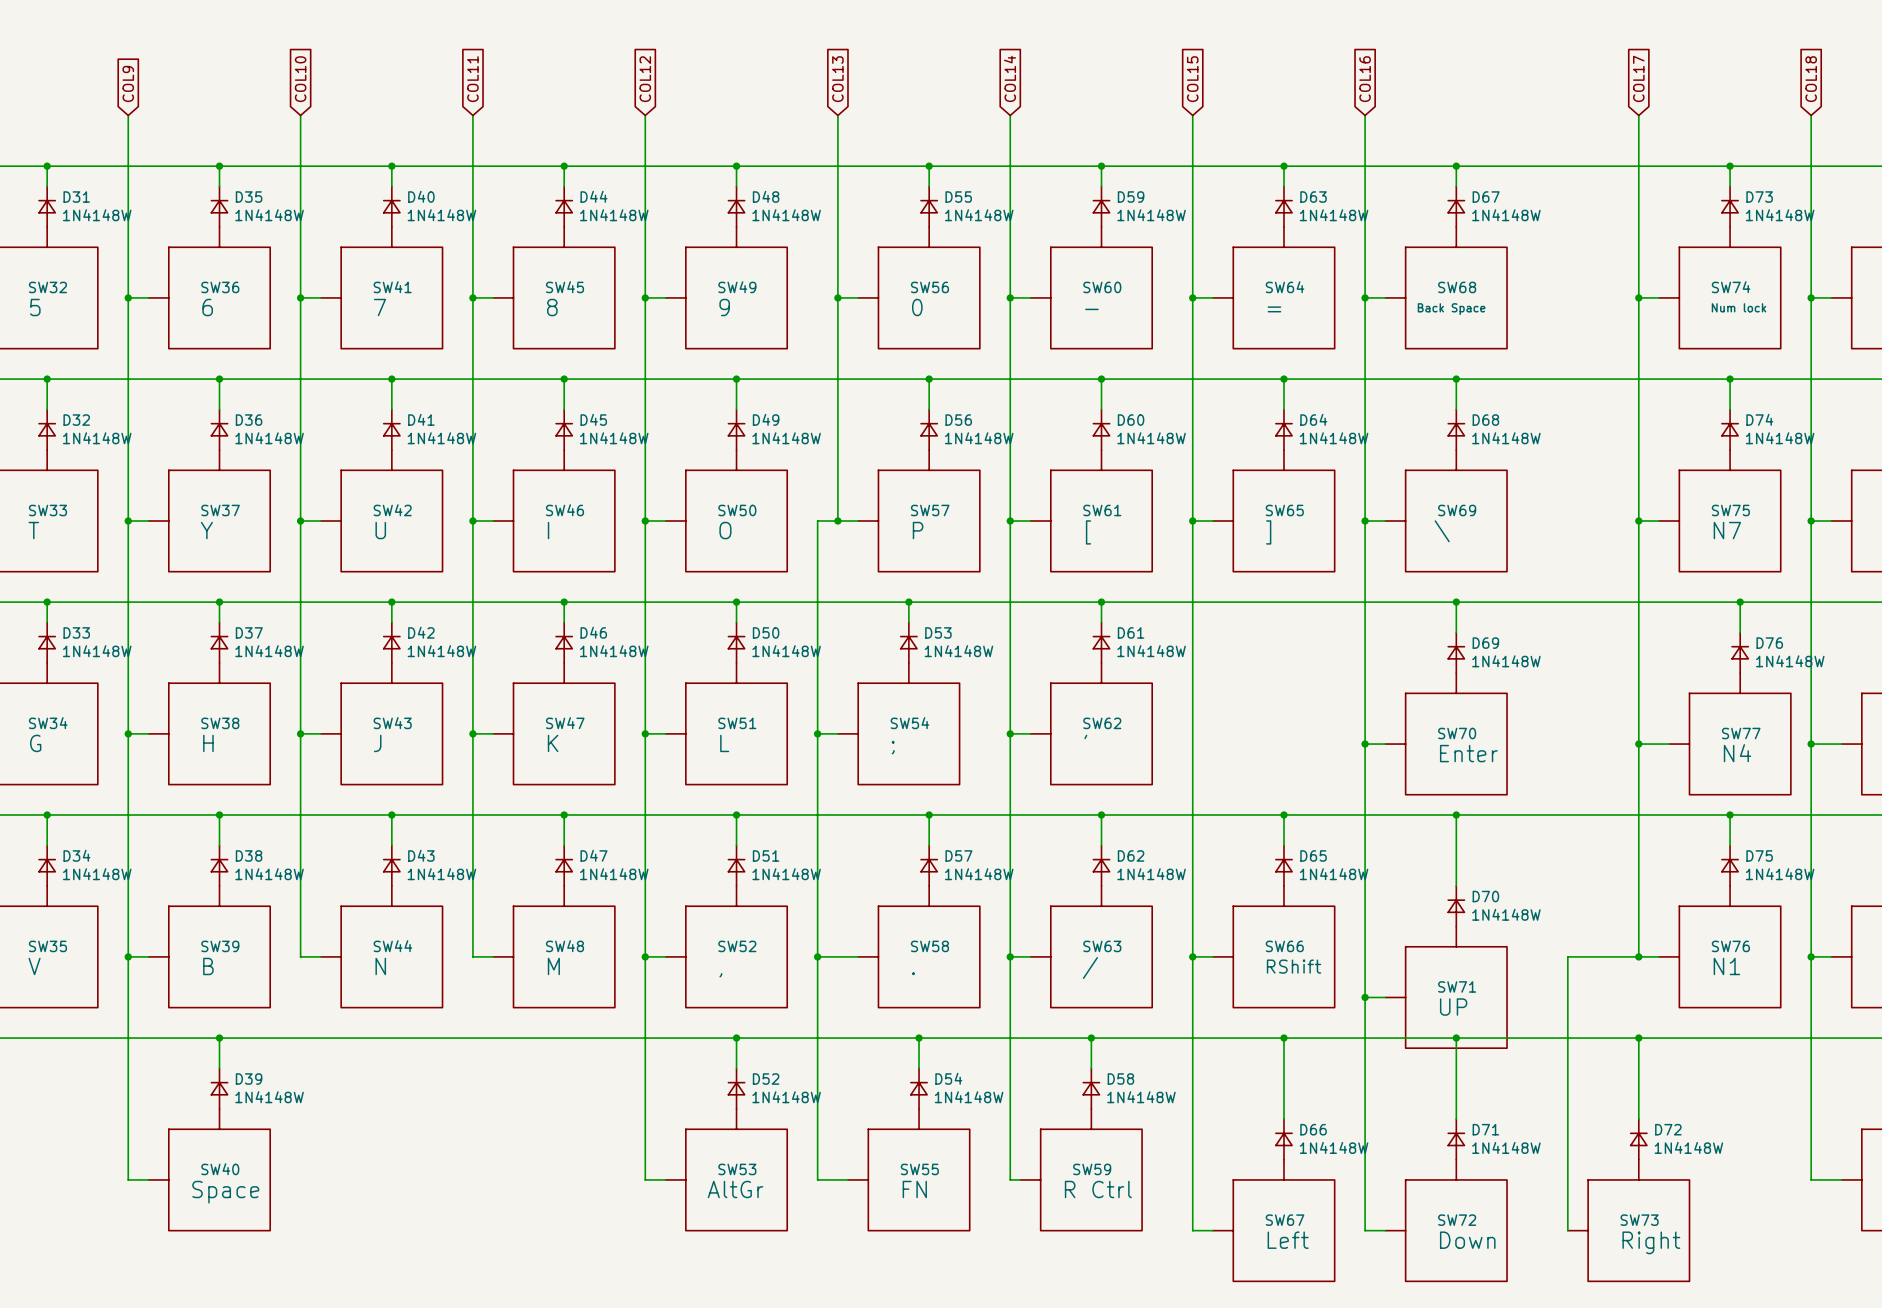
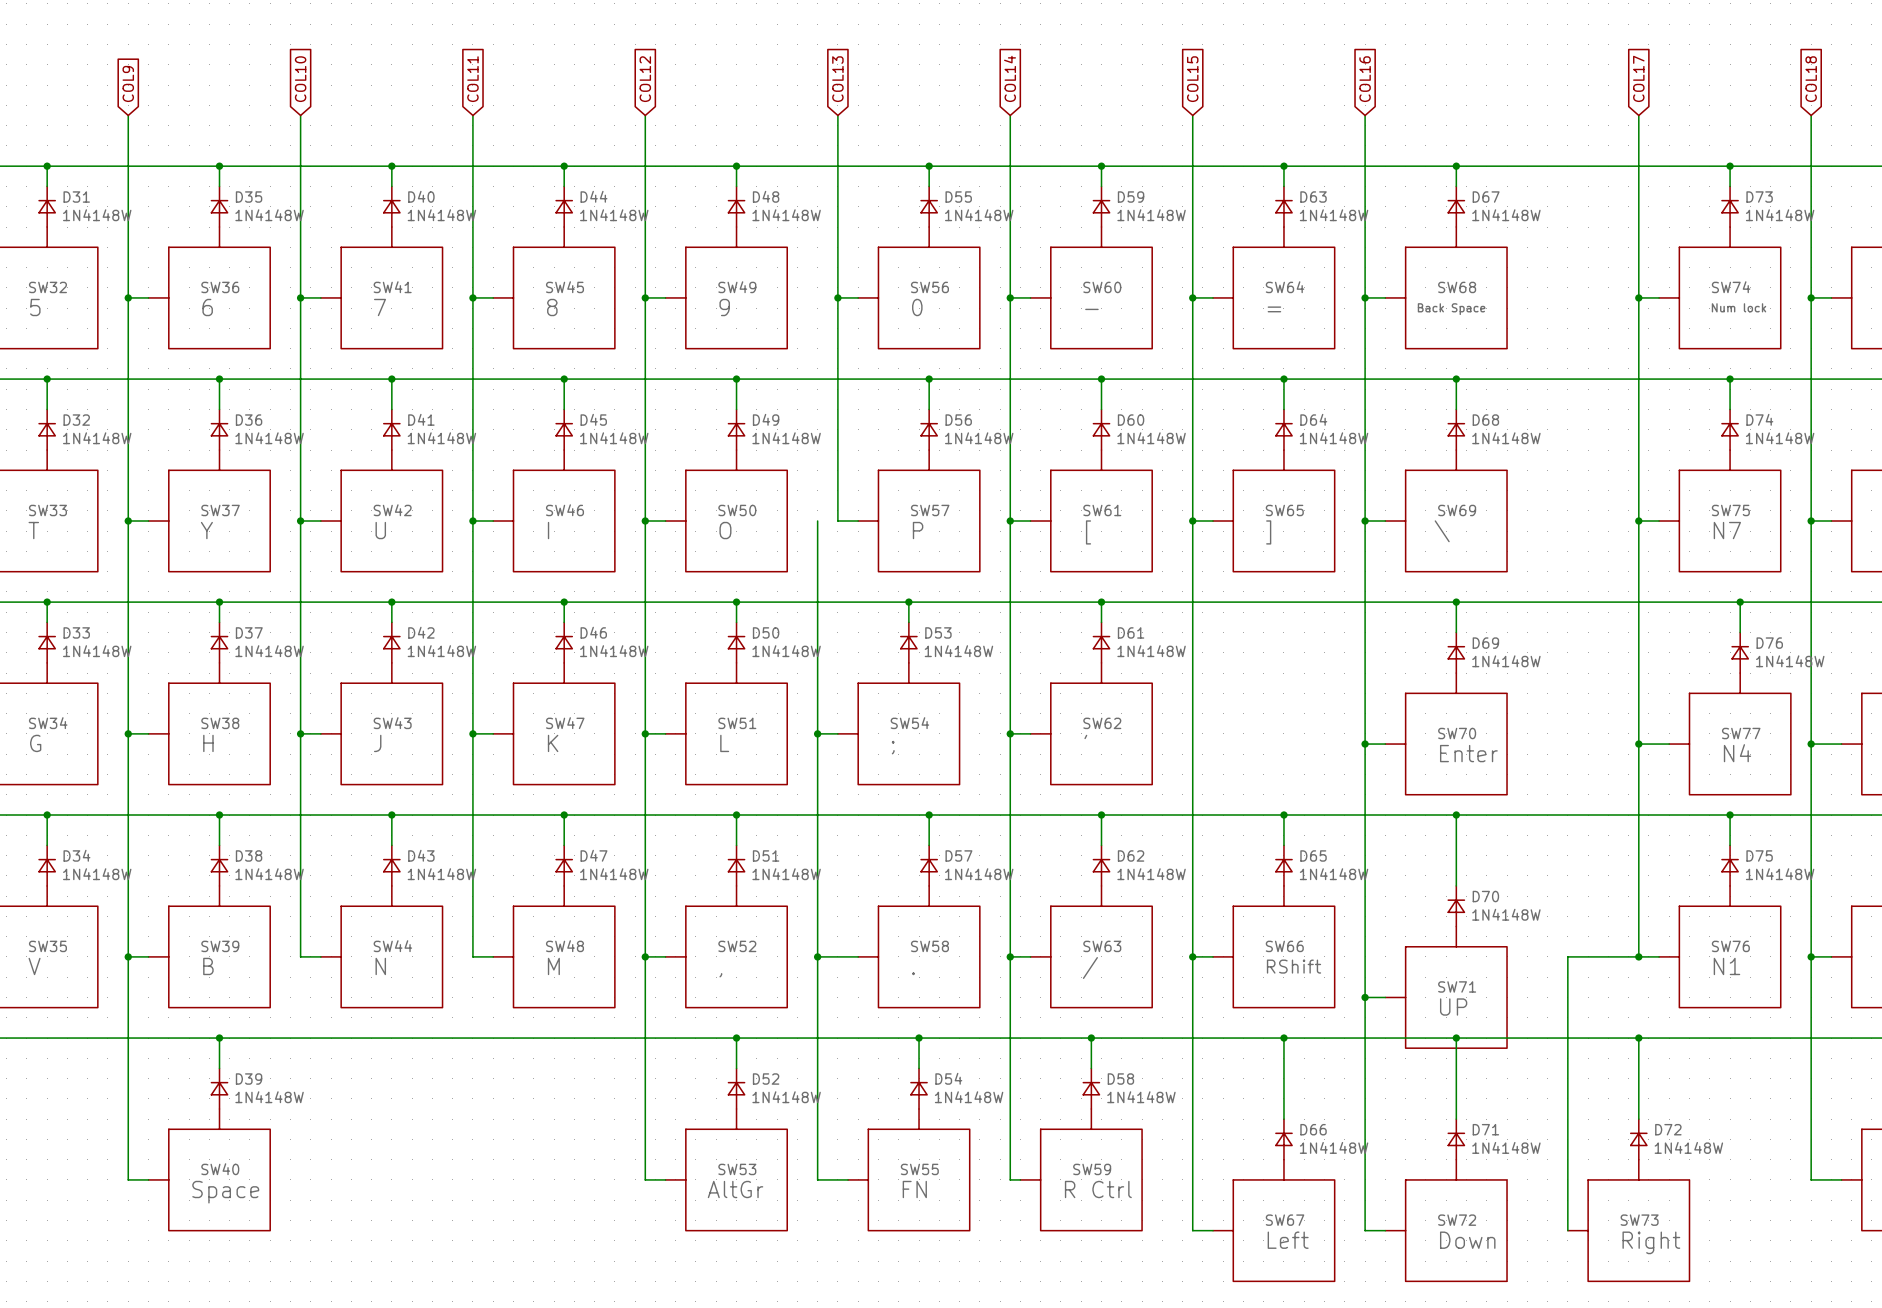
wire: (817, 521) (837, 521) -> none
junction: (837, 521) -> none

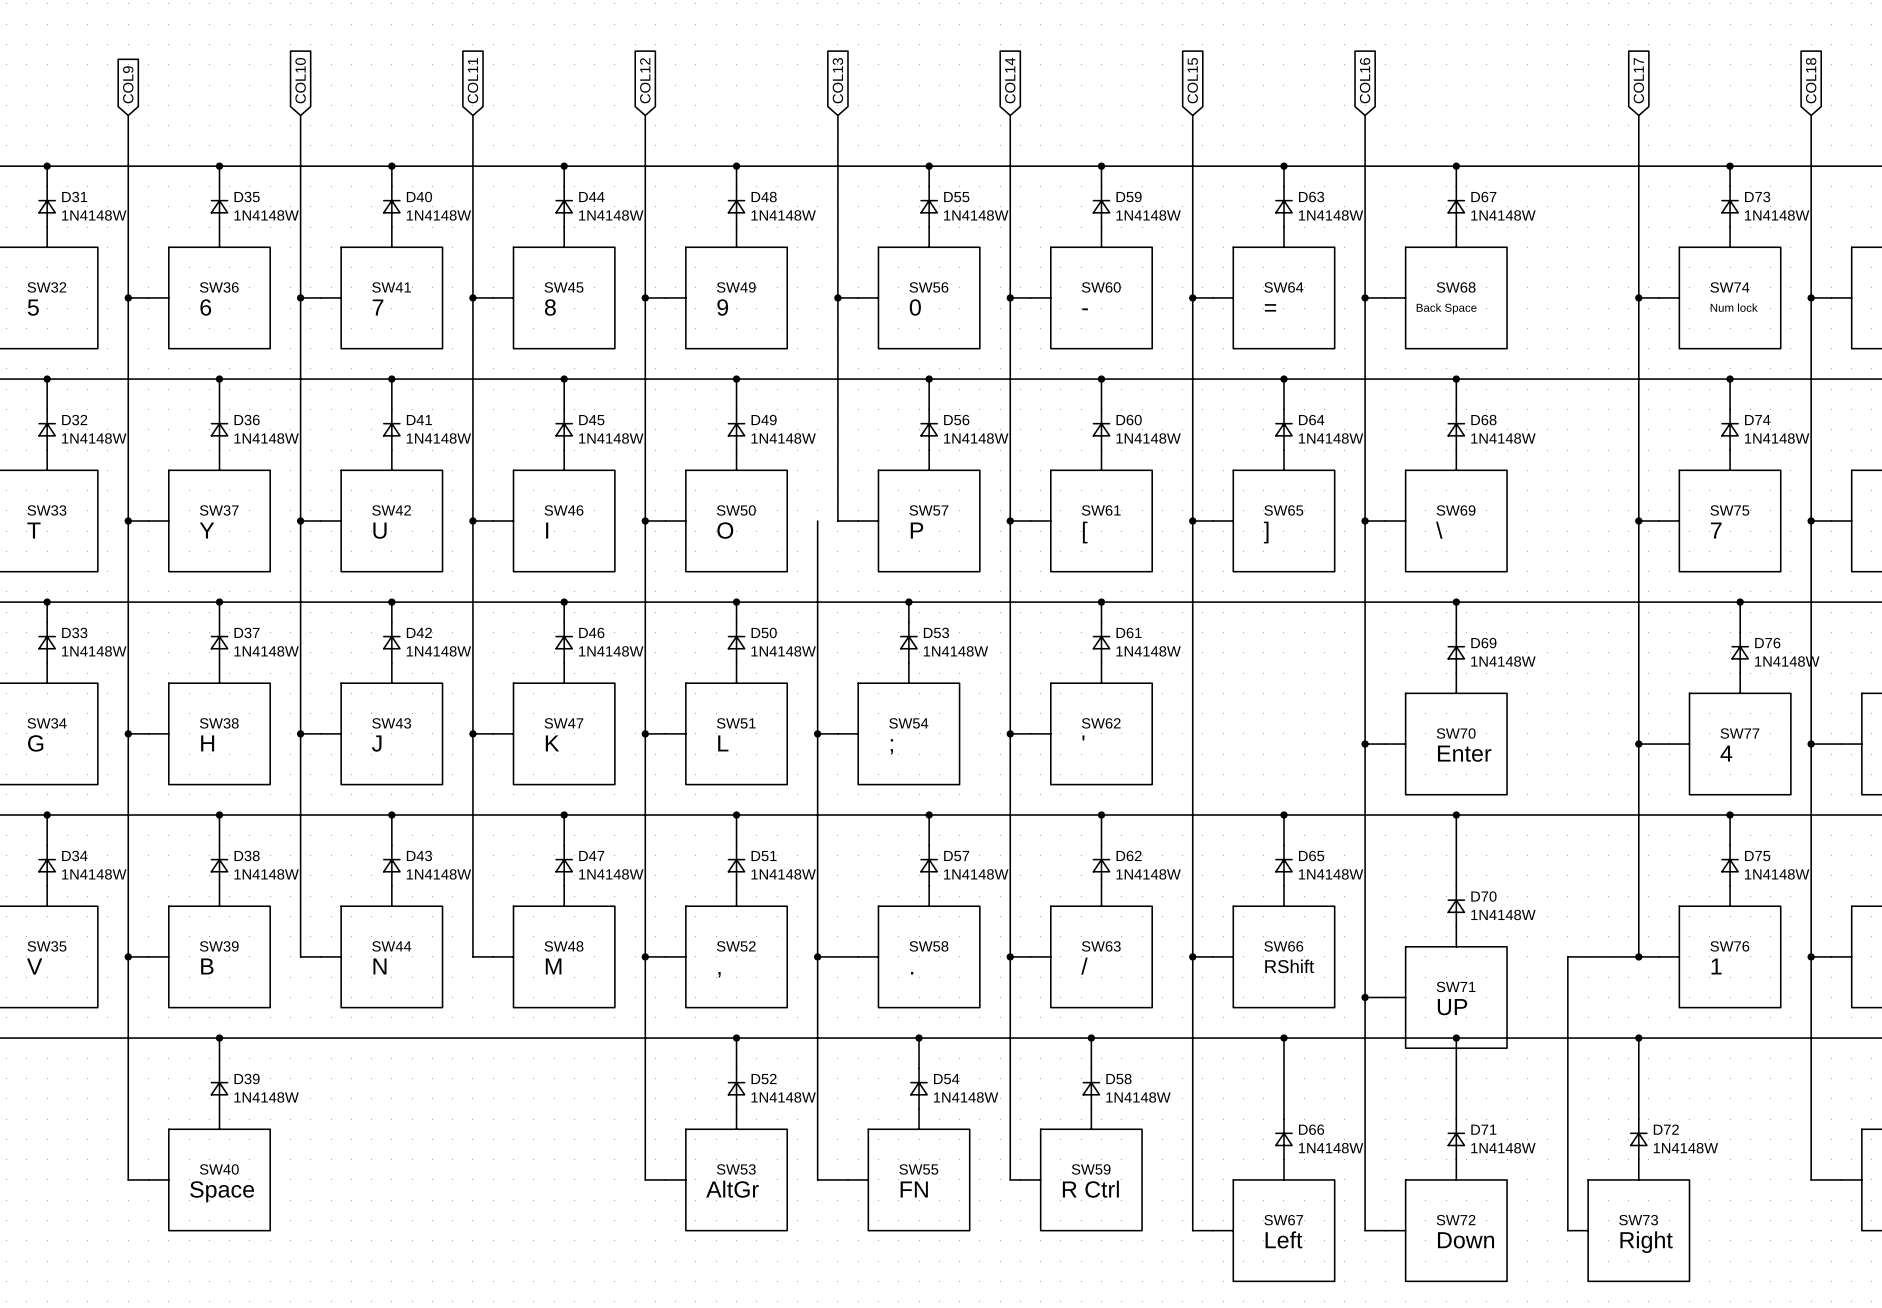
SW75 value: N7 (1727, 530) -> 7 (1716, 530)
SW77 value: N4 (1737, 753) -> 4 (1726, 753)
SW76 value: N1 (1726, 966) -> 1 (1716, 966)

